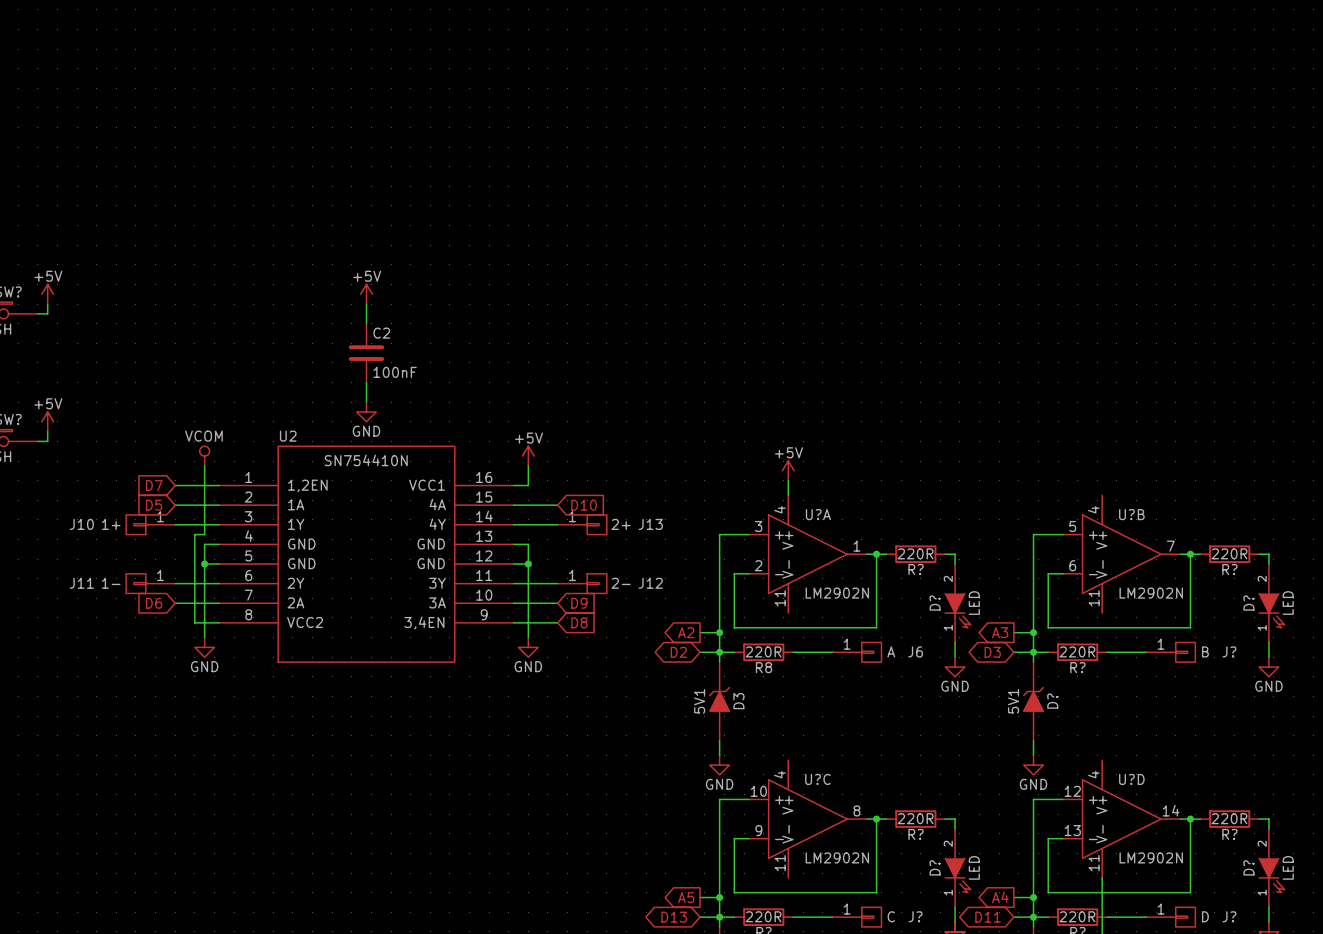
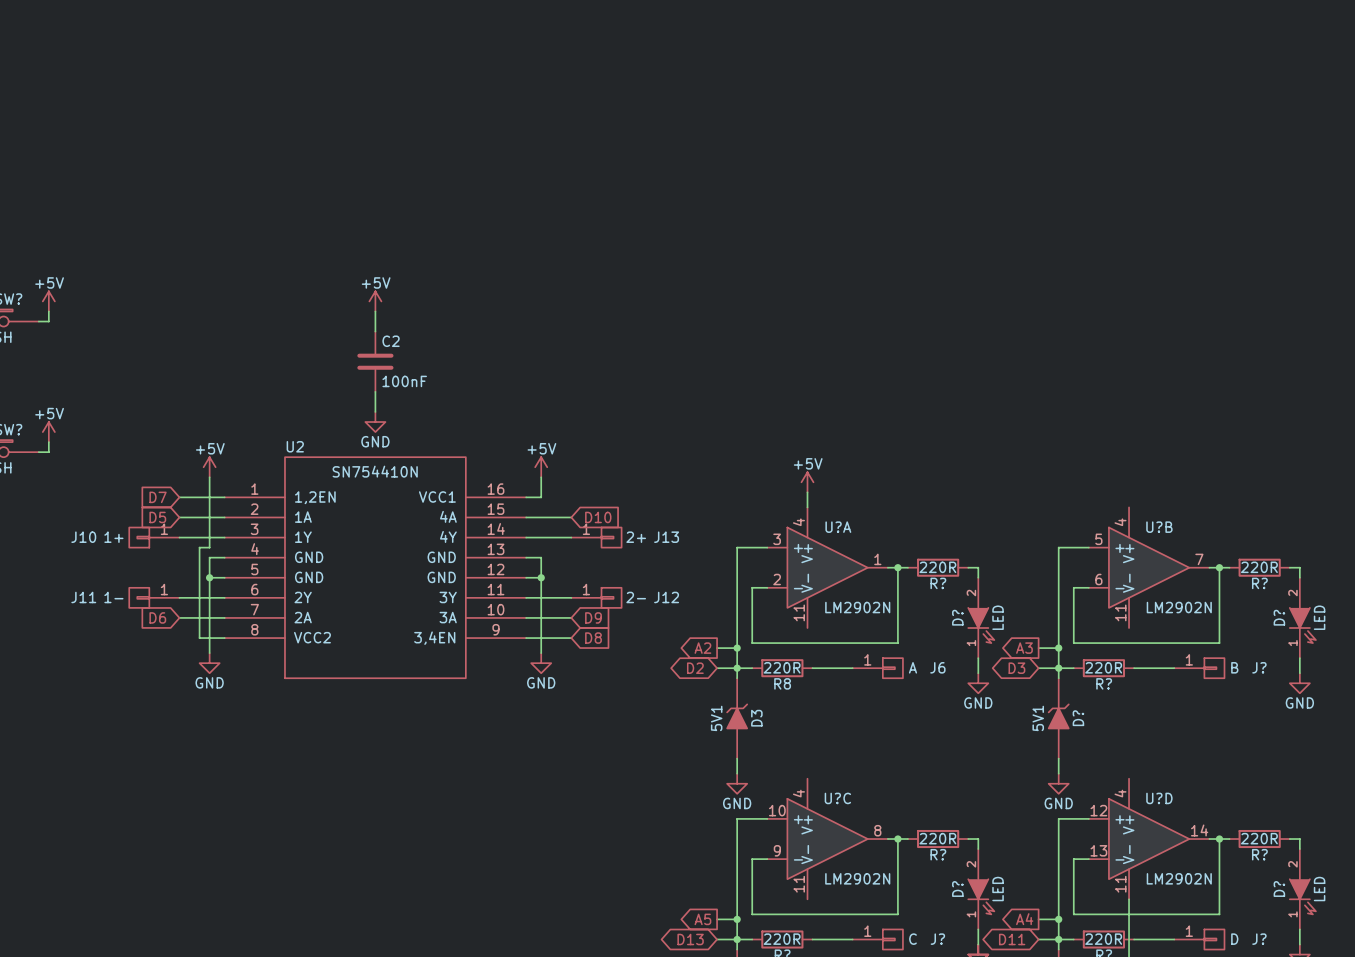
power symbol: VCOM (204, 456) -> +5V (209, 467)

